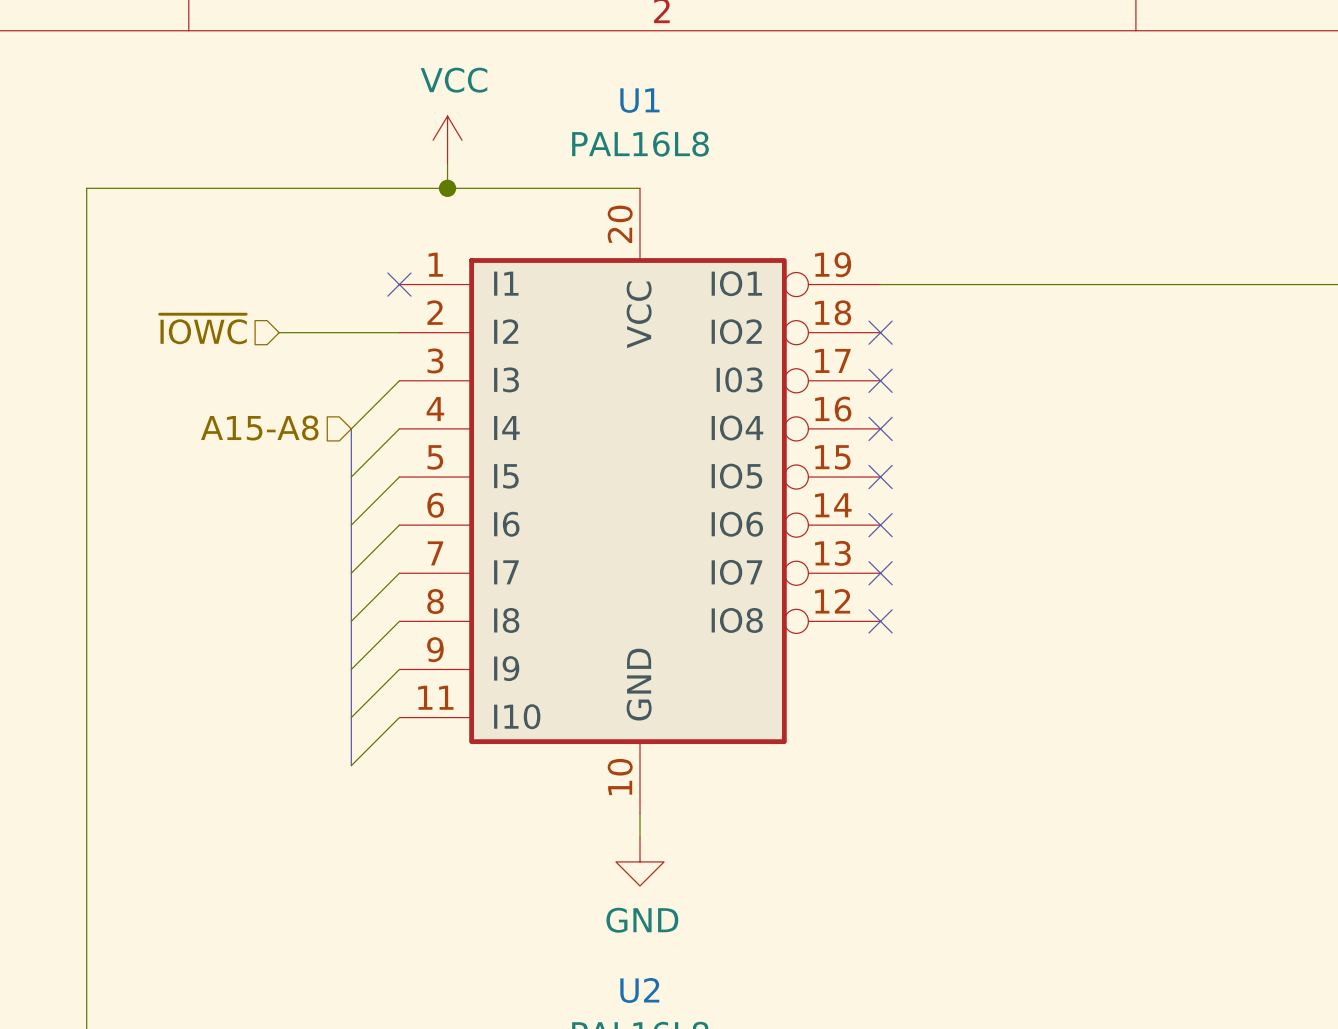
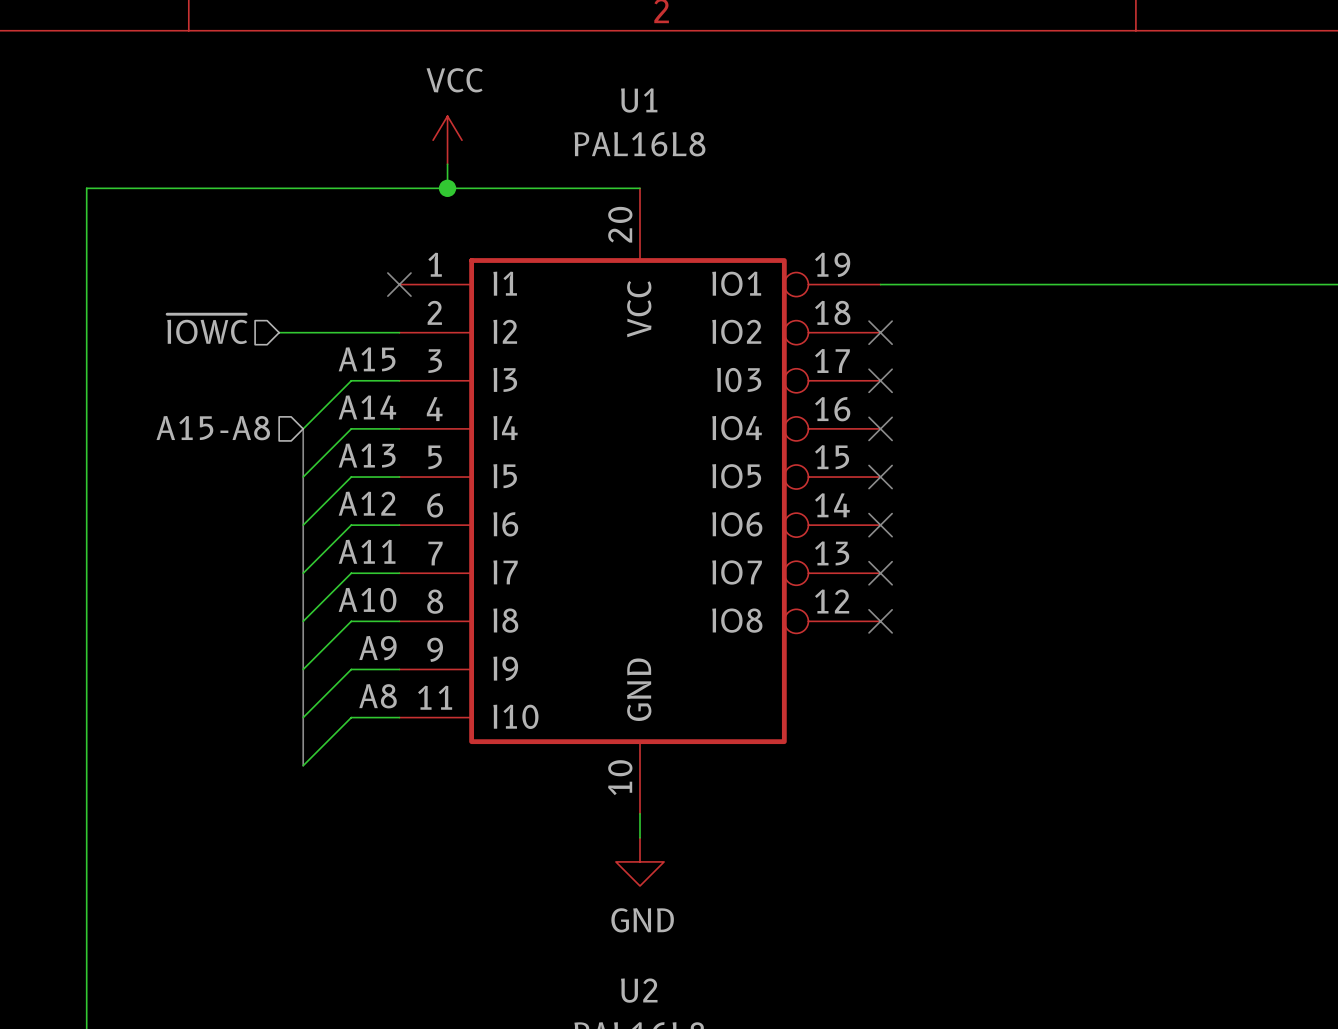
label: none -> A15 (367, 359)
wire: (399, 380) (351, 428) -> (399, 380) (351, 380) (303, 428)
label: none -> A14 (367, 407)
hierarchical label position: A15-A8 (259, 428) -> A15-A8 (213, 428)
bus: (351, 428) (351, 765) -> (303, 428) (303, 765)
wire: (399, 428) (351, 477) -> (399, 428) (351, 428) (303, 477)
label: none -> A13 (367, 455)
wire: (399, 477) (351, 525) -> (399, 477) (351, 477) (303, 525)
label: none -> A12 (367, 503)
wire: (399, 525) (351, 573) -> (399, 525) (351, 525) (303, 573)
label: none -> A11 (367, 551)
wire: (399, 573) (351, 621) -> (399, 573) (351, 573) (303, 621)
label: none -> A10 (367, 600)
wire: (399, 621) (351, 669) -> (399, 621) (351, 621) (303, 669)
label: none -> A9 (377, 648)
wire: (399, 669) (351, 717) -> (399, 669) (351, 669) (303, 717)
label: none -> A8 (378, 696)
wire: (399, 717) (351, 765) -> (399, 717) (351, 717) (303, 765)

